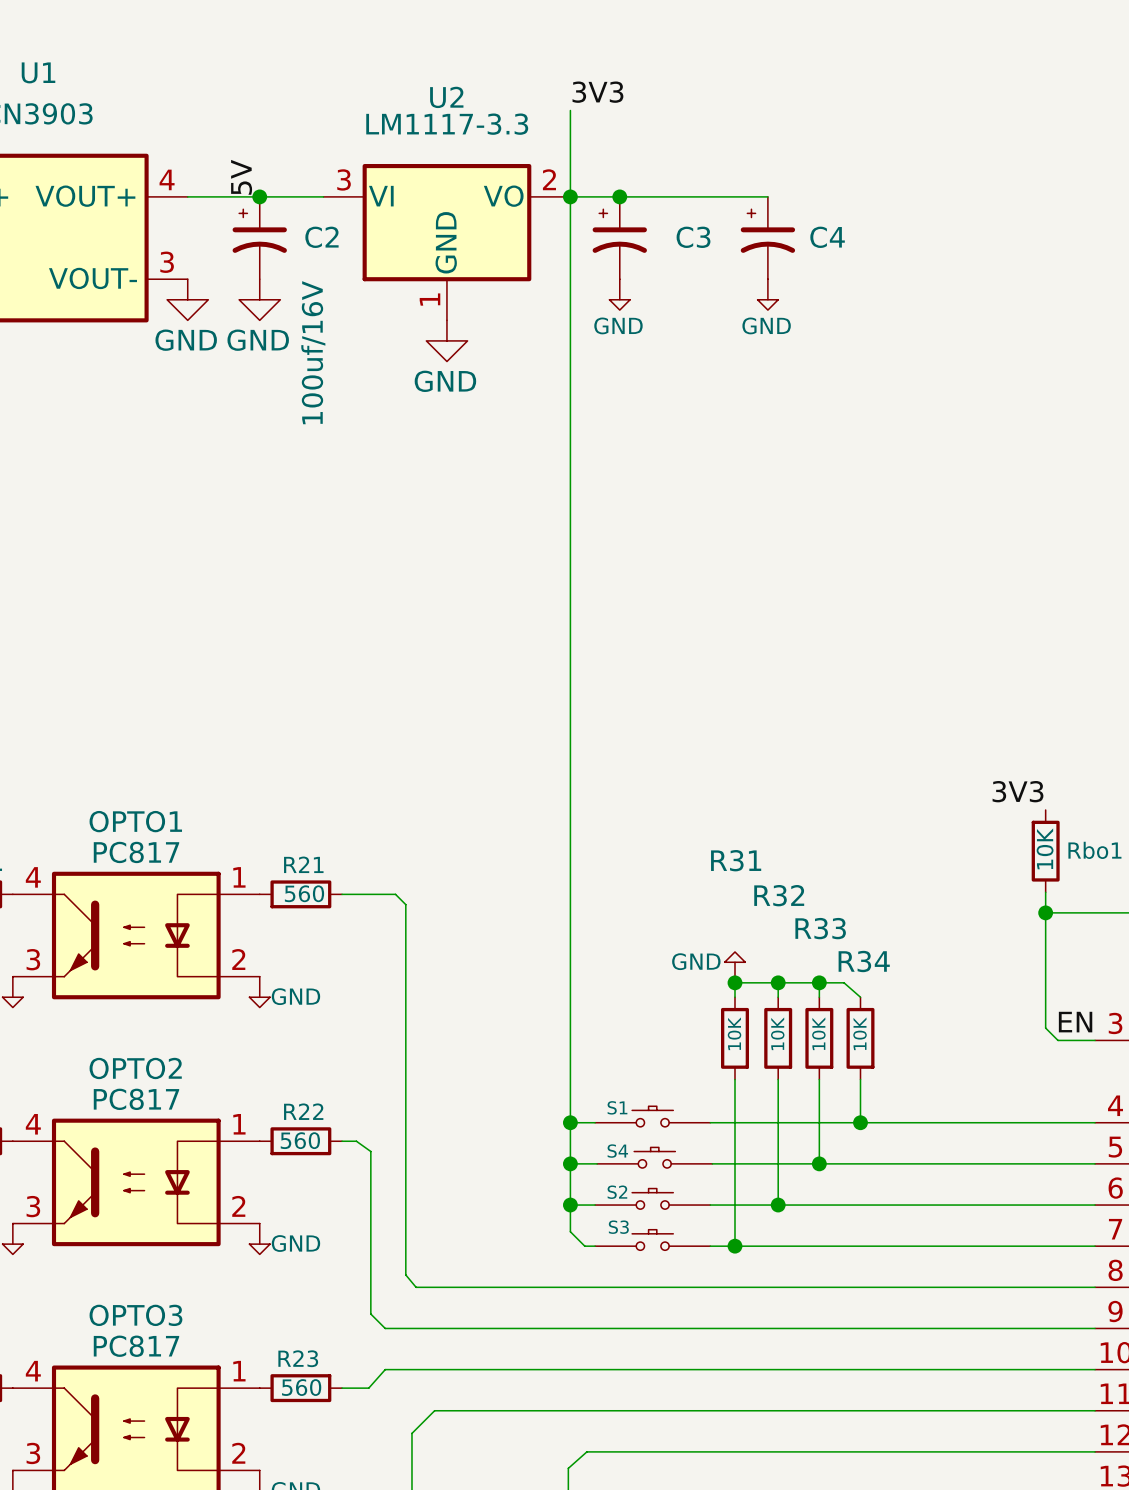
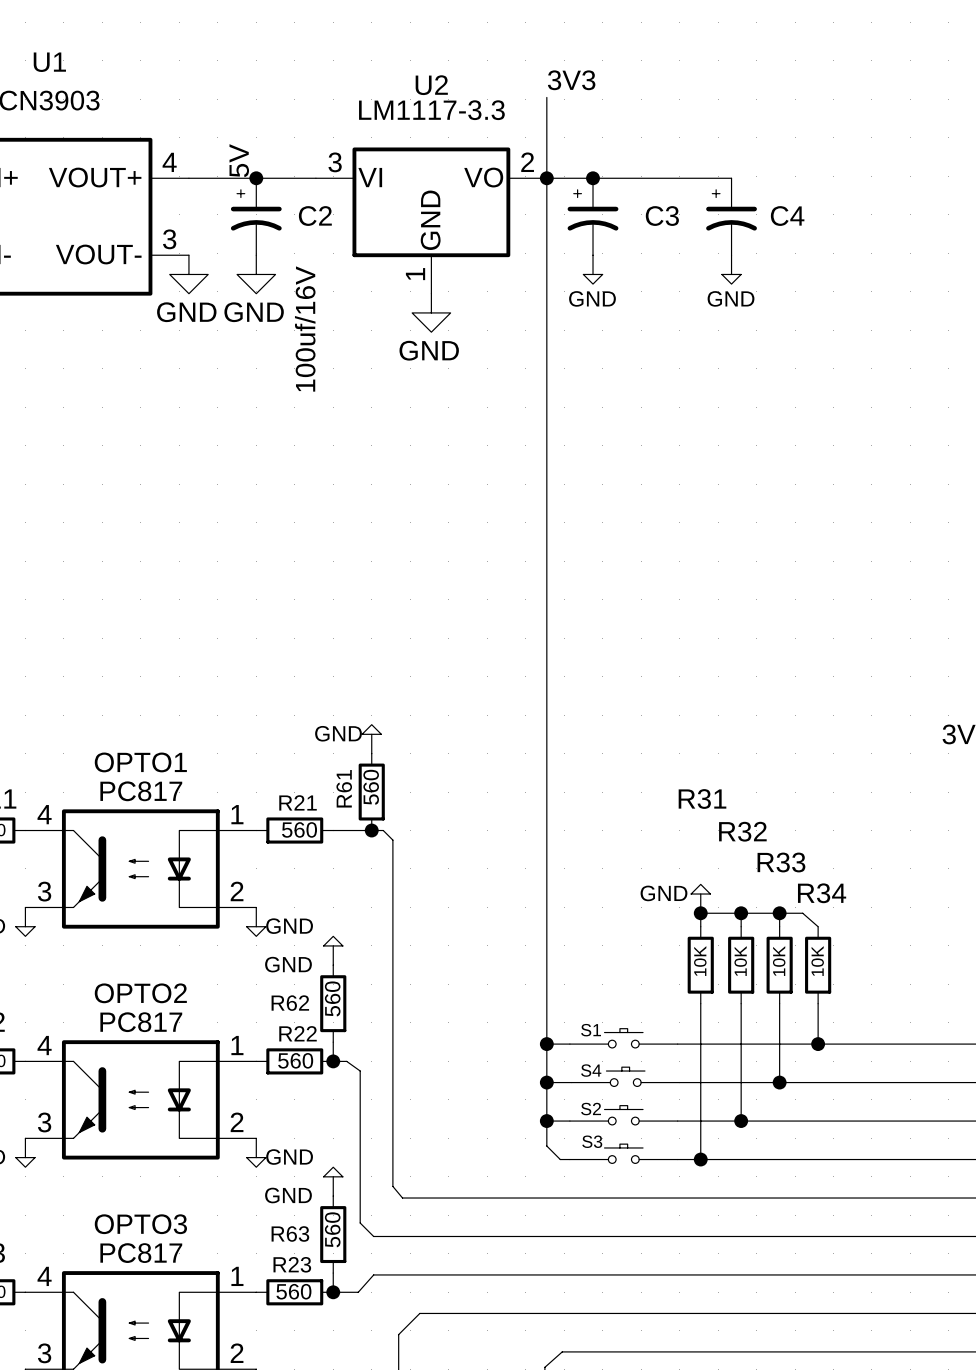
power symbol: none -> GND (371, 739)
R61: none -> 560 (371, 792)
junction: none -> (371, 830)
power symbol: none -> GND (333, 950)
R62: none -> 560 (333, 1003)
wire: none -> (333, 1042) (333, 1061)
junction: none -> (333, 1061)
power symbol: none -> GND (333, 1181)
R63: none -> 560 (333, 1234)
wire: none -> (333, 1273) (333, 1292)
junction: none -> (333, 1292)

